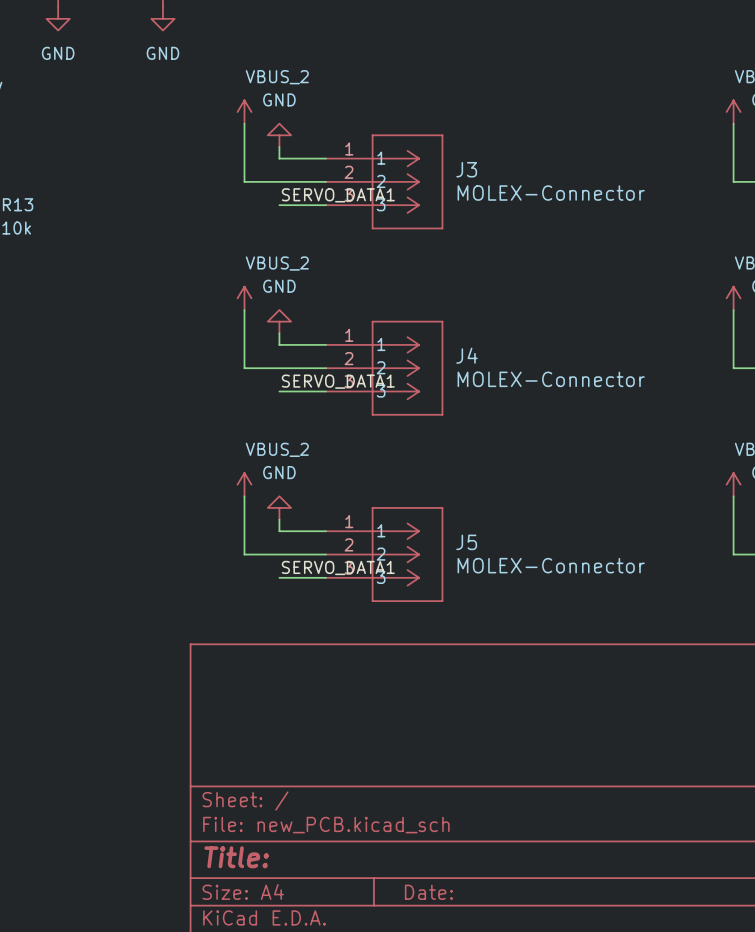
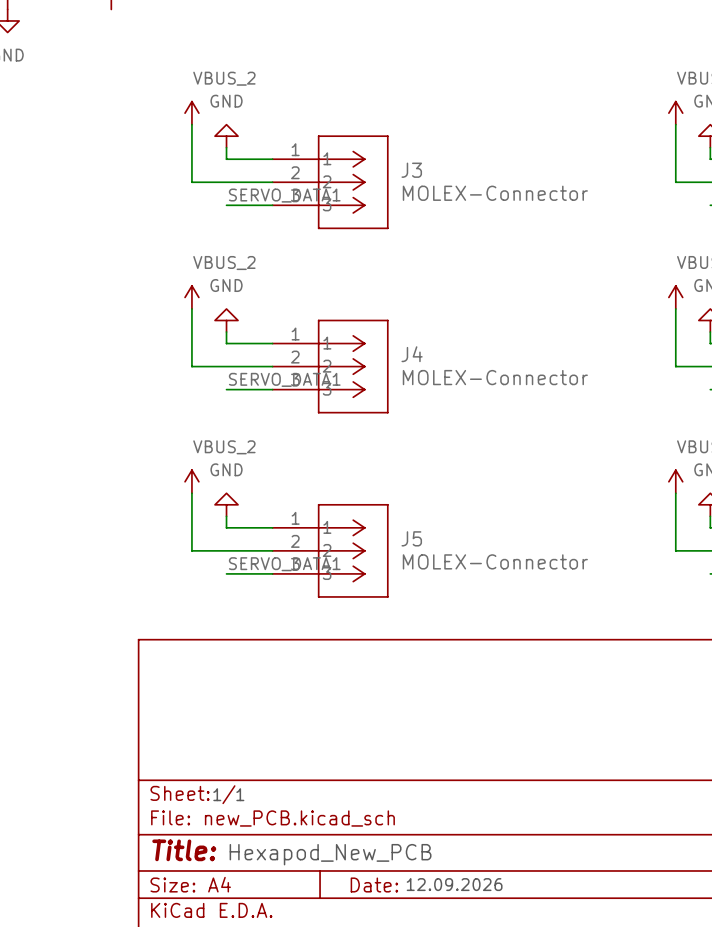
power symbol: GND (162, 18) -> none
text: none -> 1 (217, 794)
text: none -> 1 (240, 794)
text: none -> Hexapod_New_PCB (330, 854)
text: none -> 12.09.2026 (454, 884)

